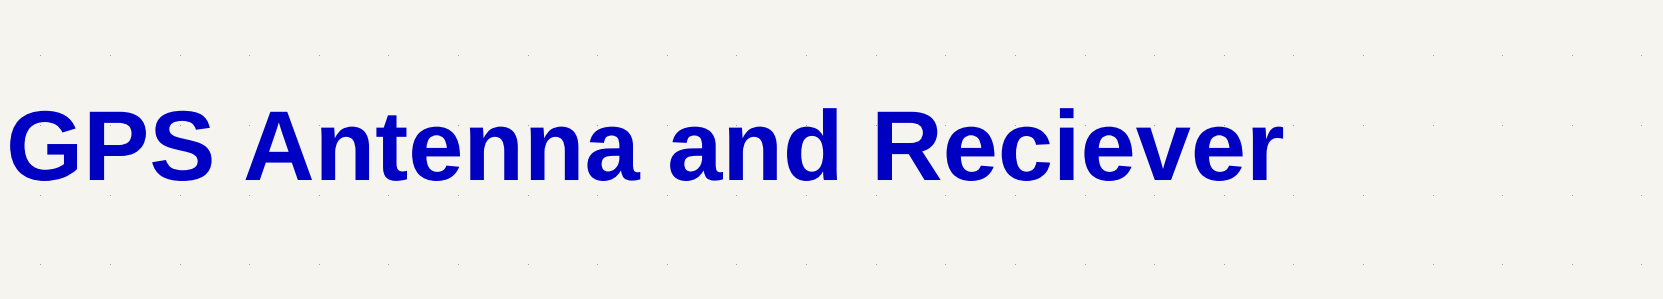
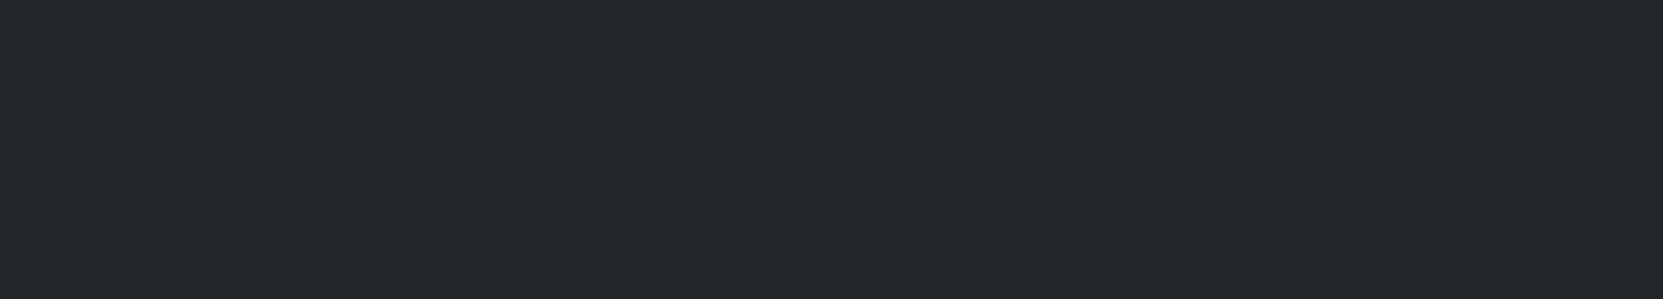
text: GPS Antenna and Reciever (646, 144) -> none

